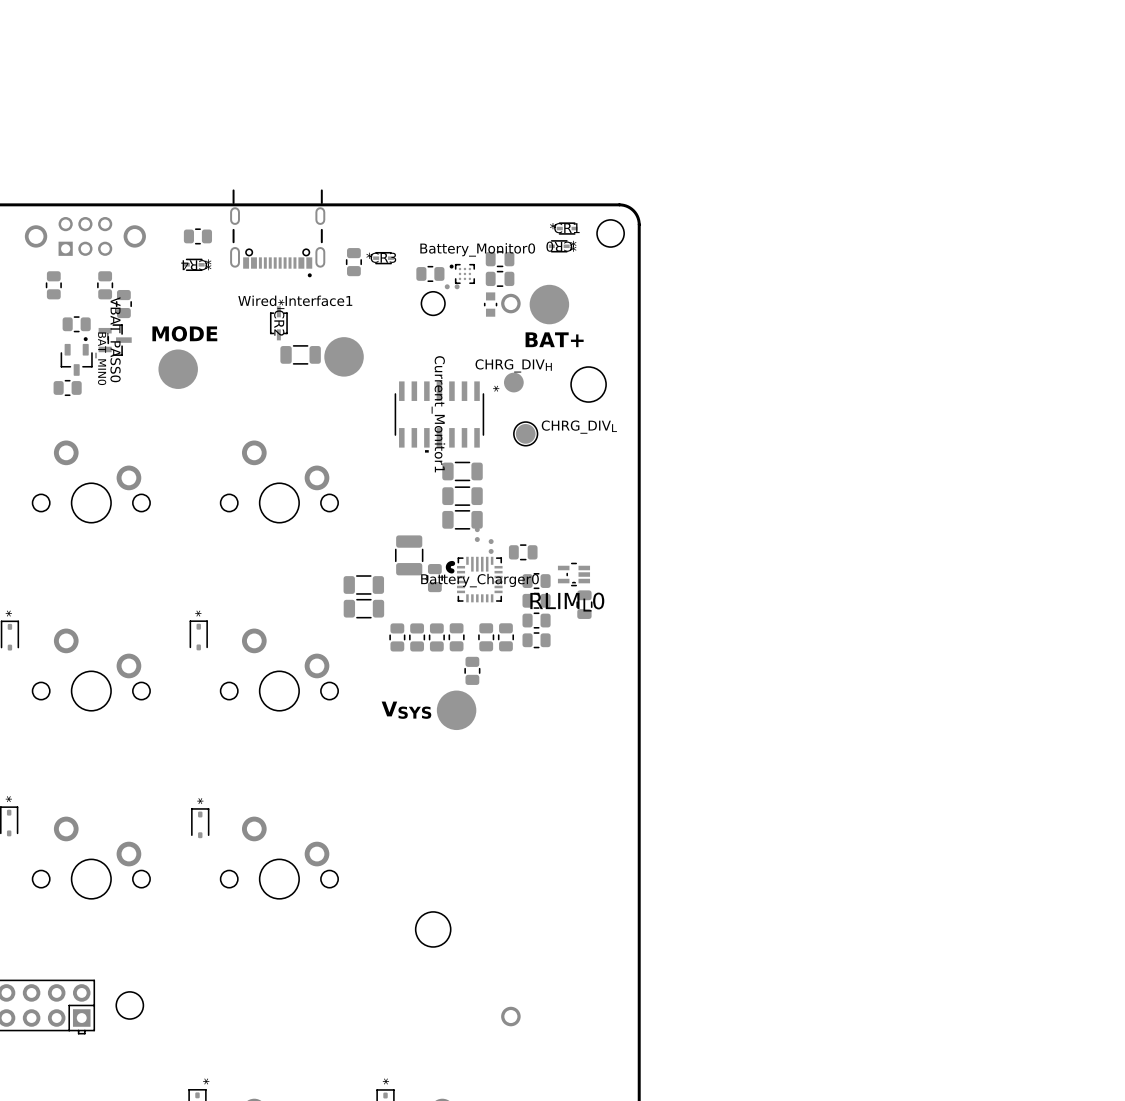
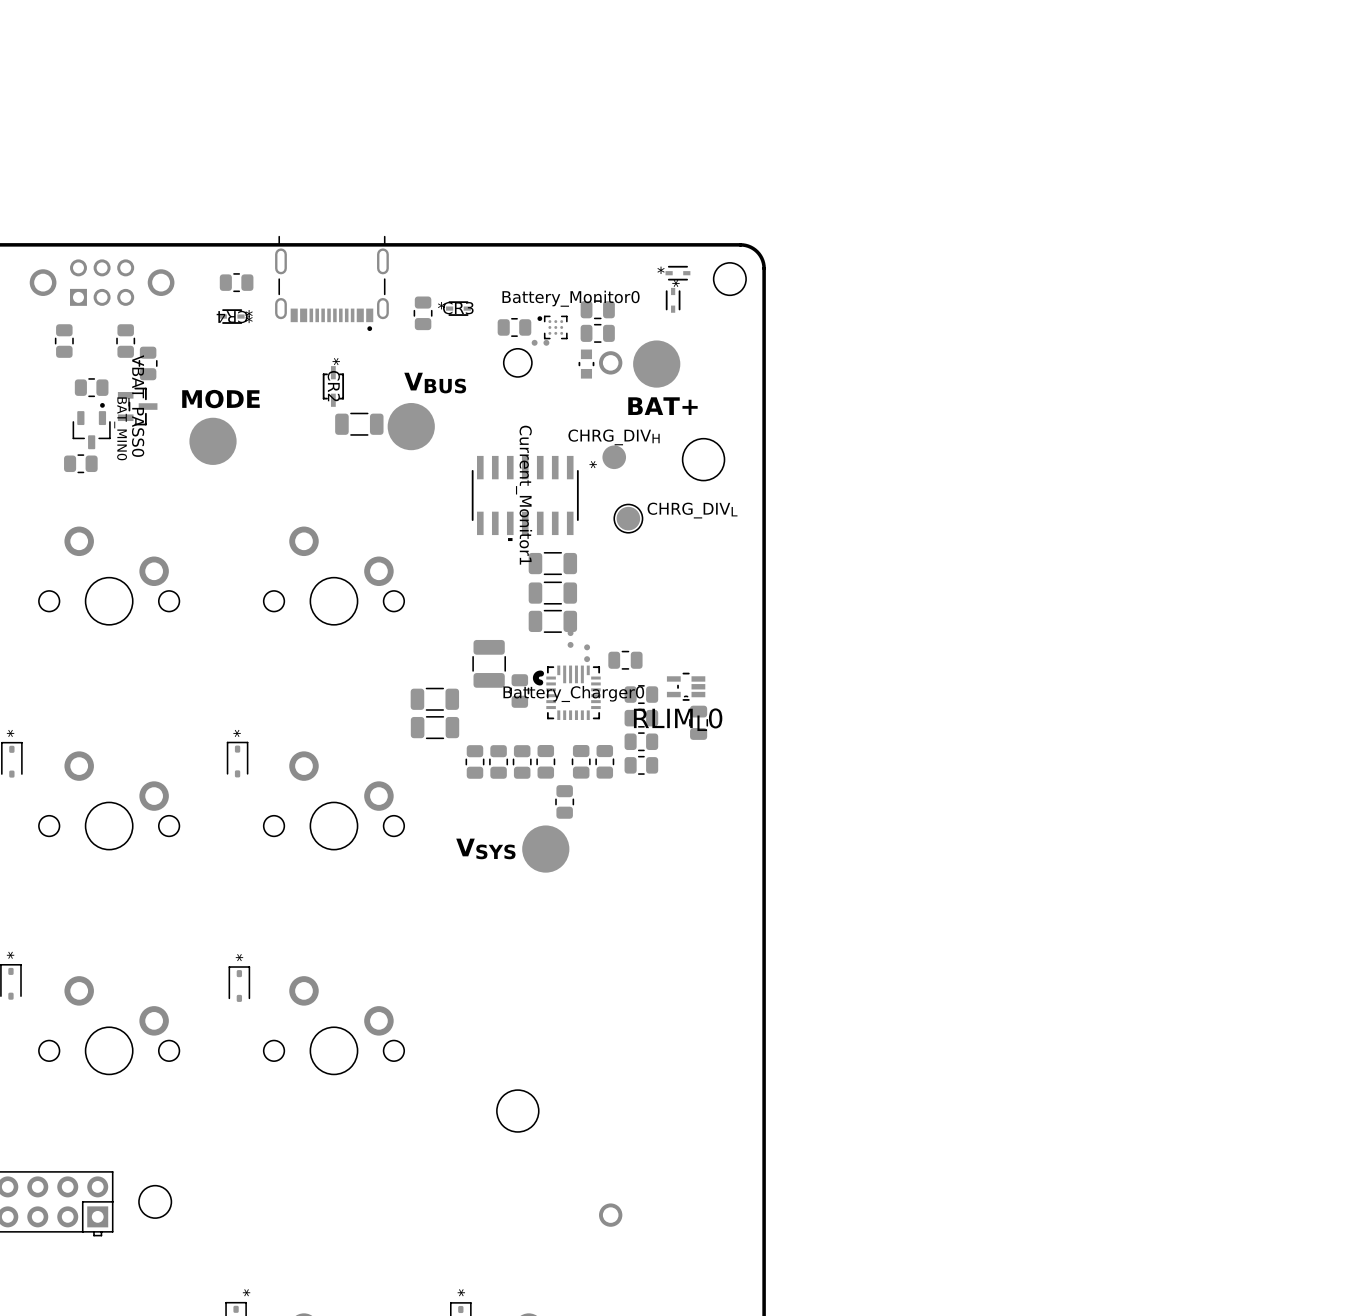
CR1 name: CR1 (566, 228) -> none
Wired_Interface1: (277, 233) -> none
part: none -> (331, 283)
CR0: (559, 246) -> none
part: none -> (673, 300)
text: none -> VBUS (435, 383)

